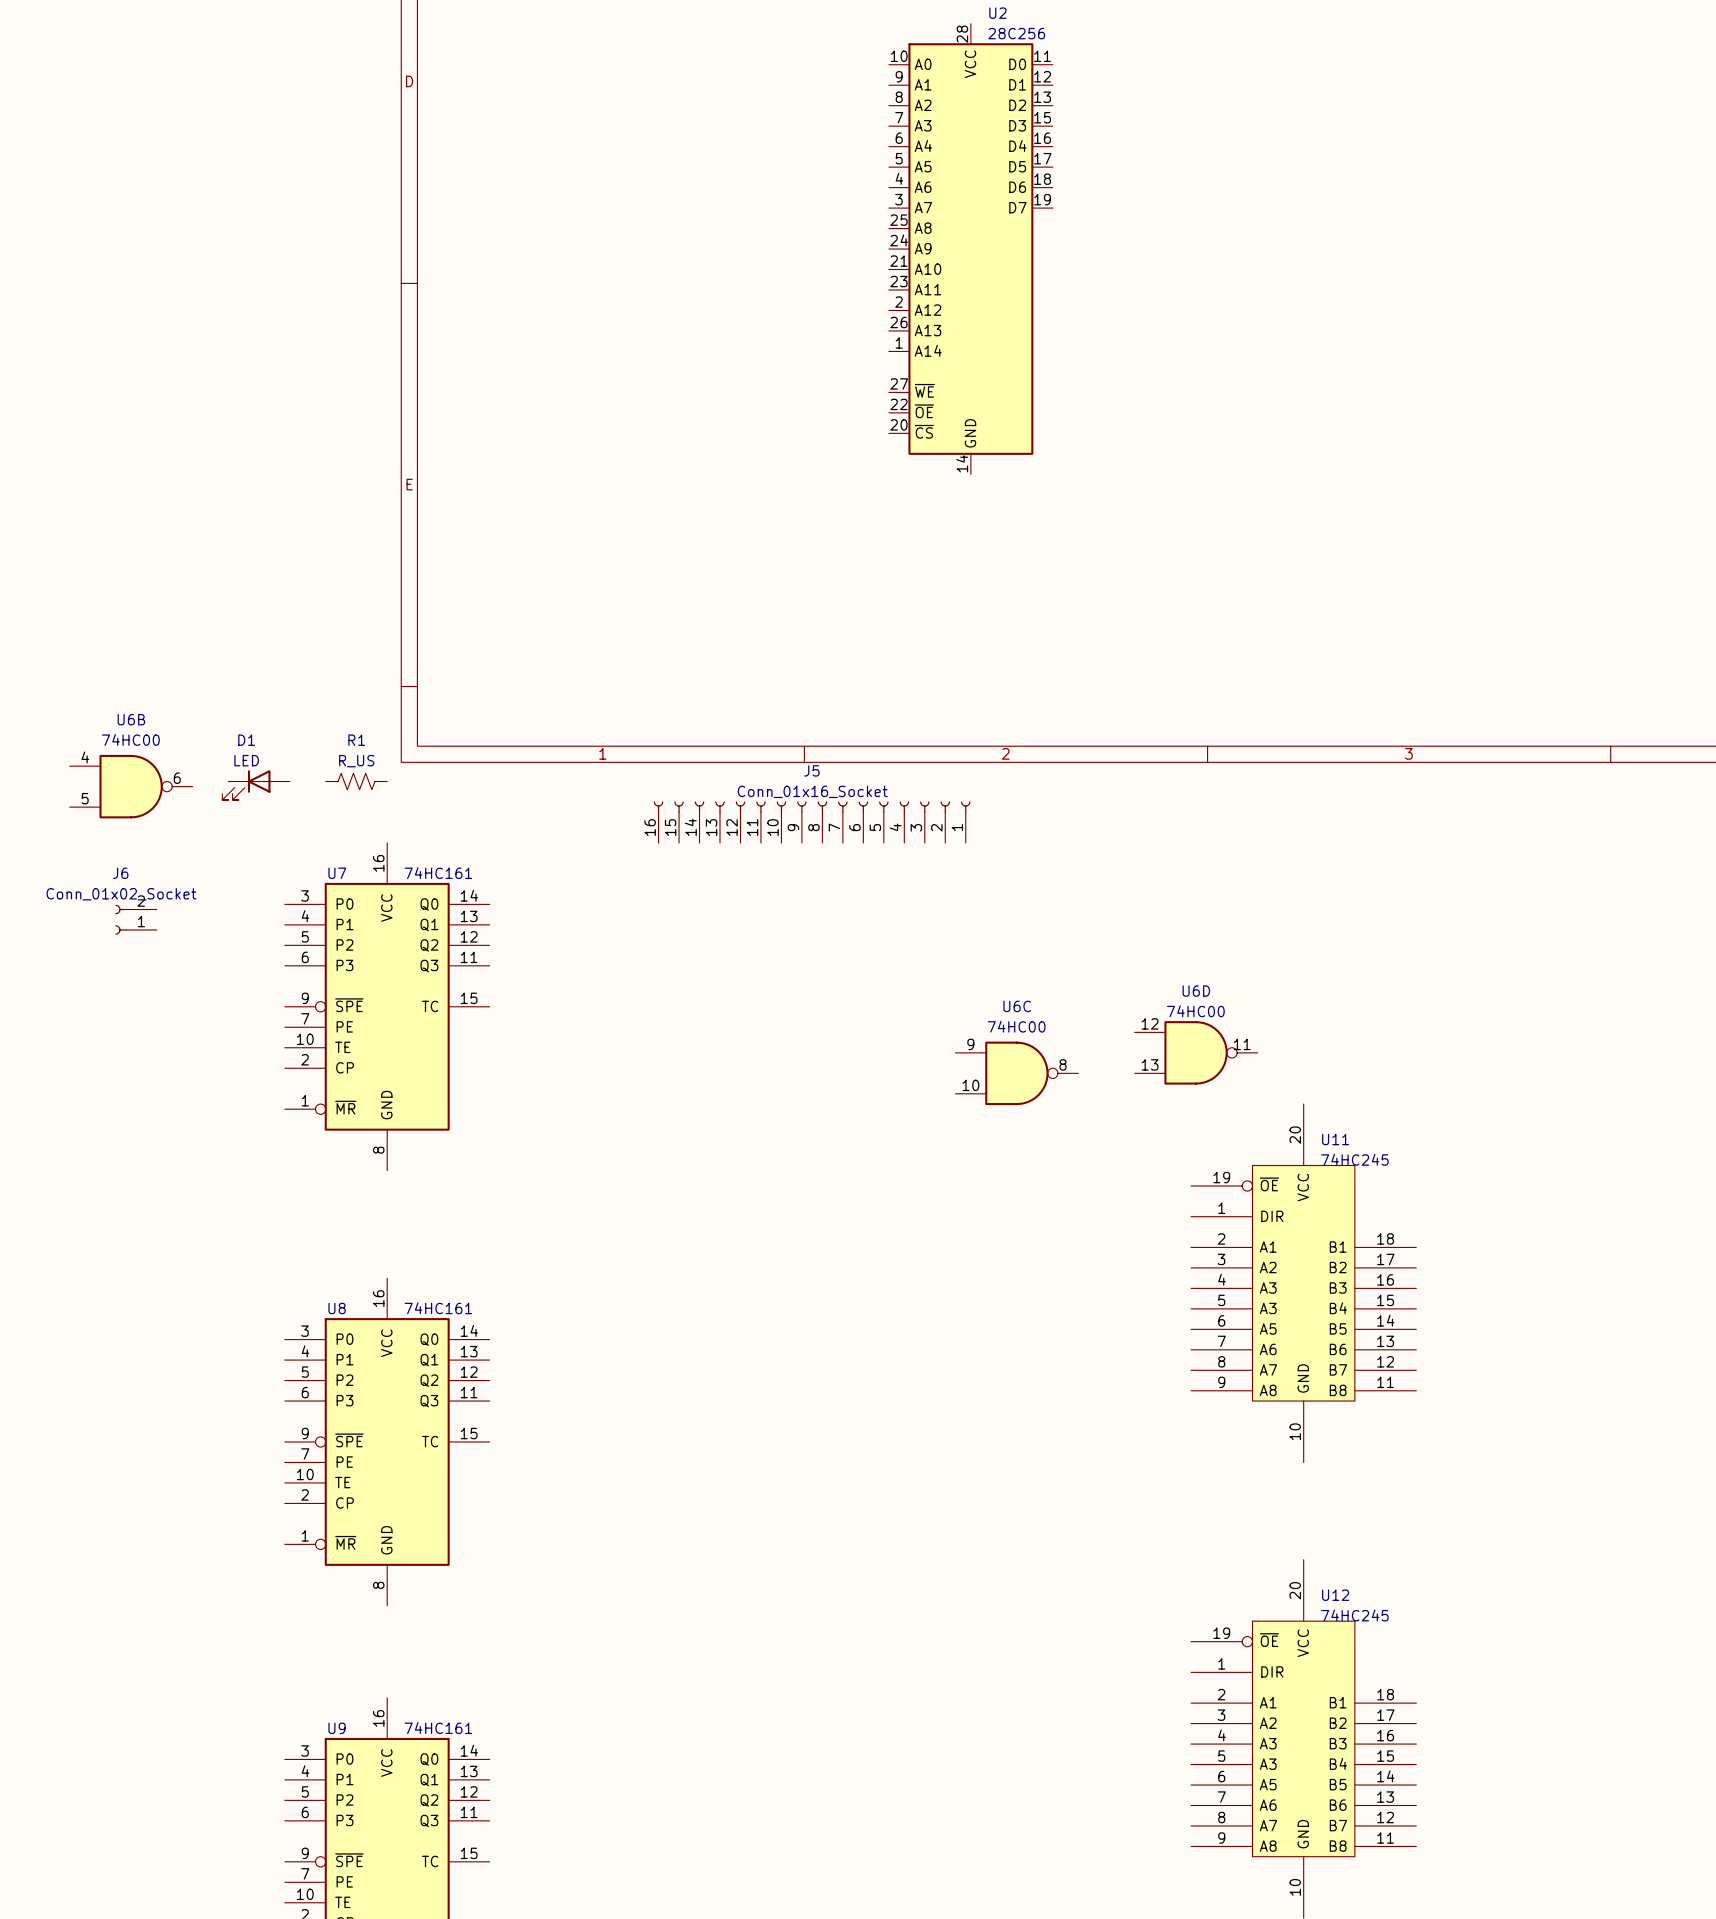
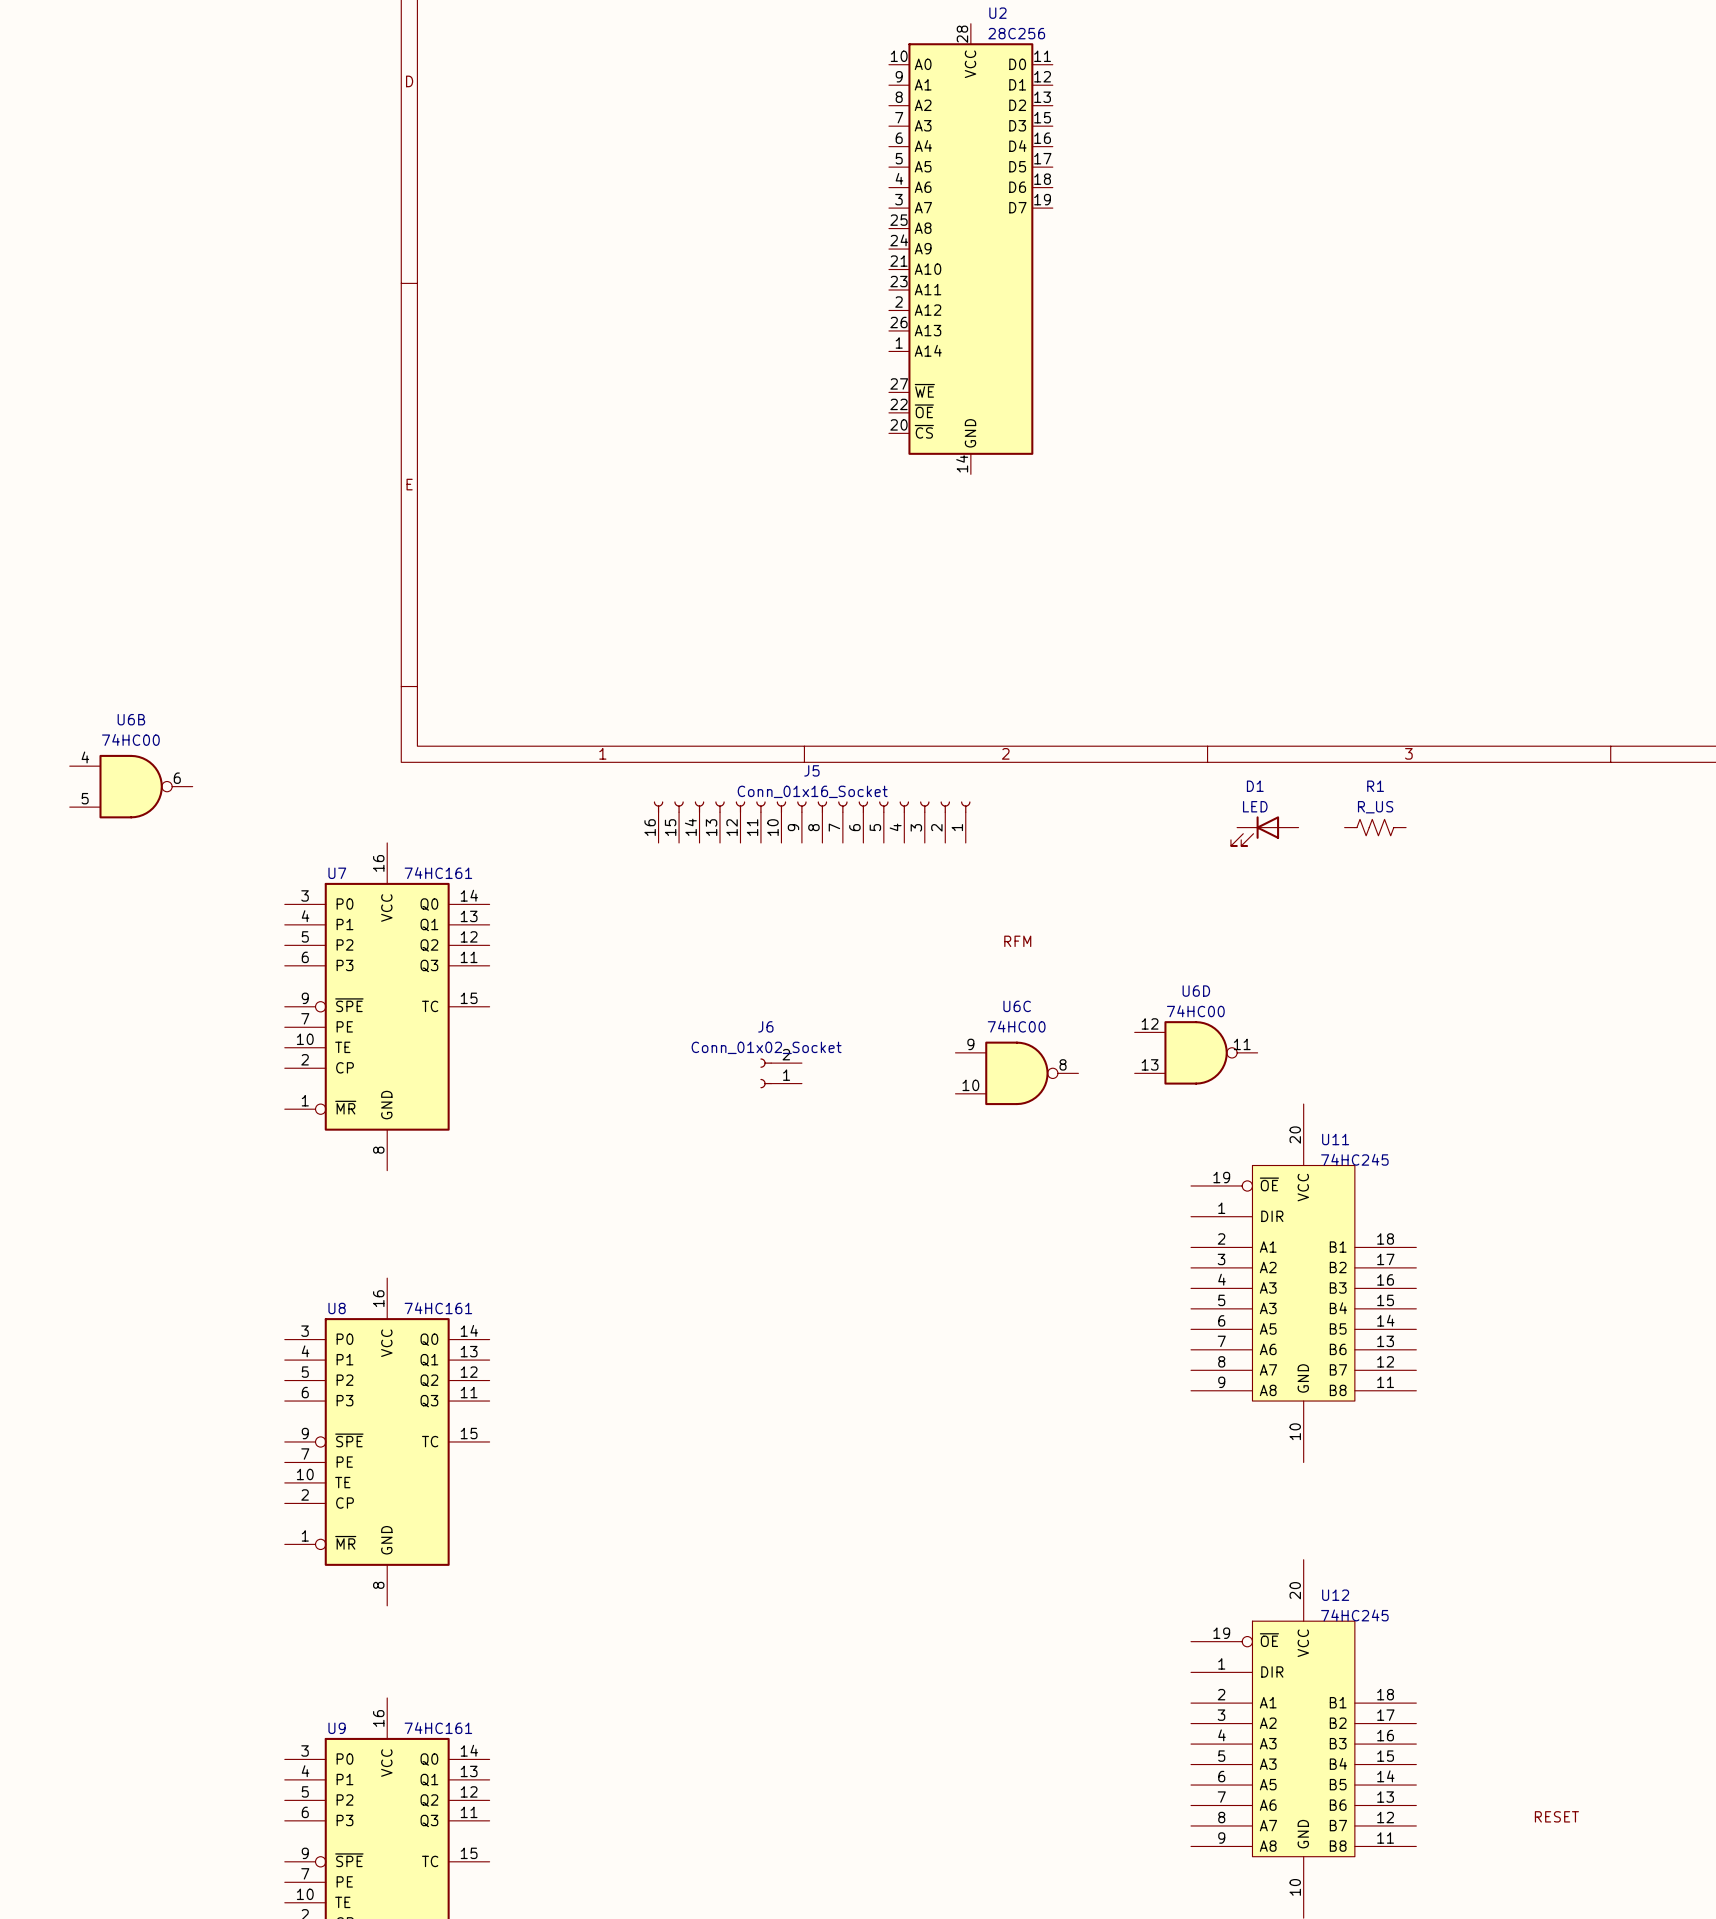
R1 position: (356, 781) -> (1375, 827)
D1 position: (256, 785) -> (1264, 831)
J6 position: (136, 919) -> (781, 1073)
label: none -> RFM (1017, 941)
label: none -> RESET (1556, 1816)

